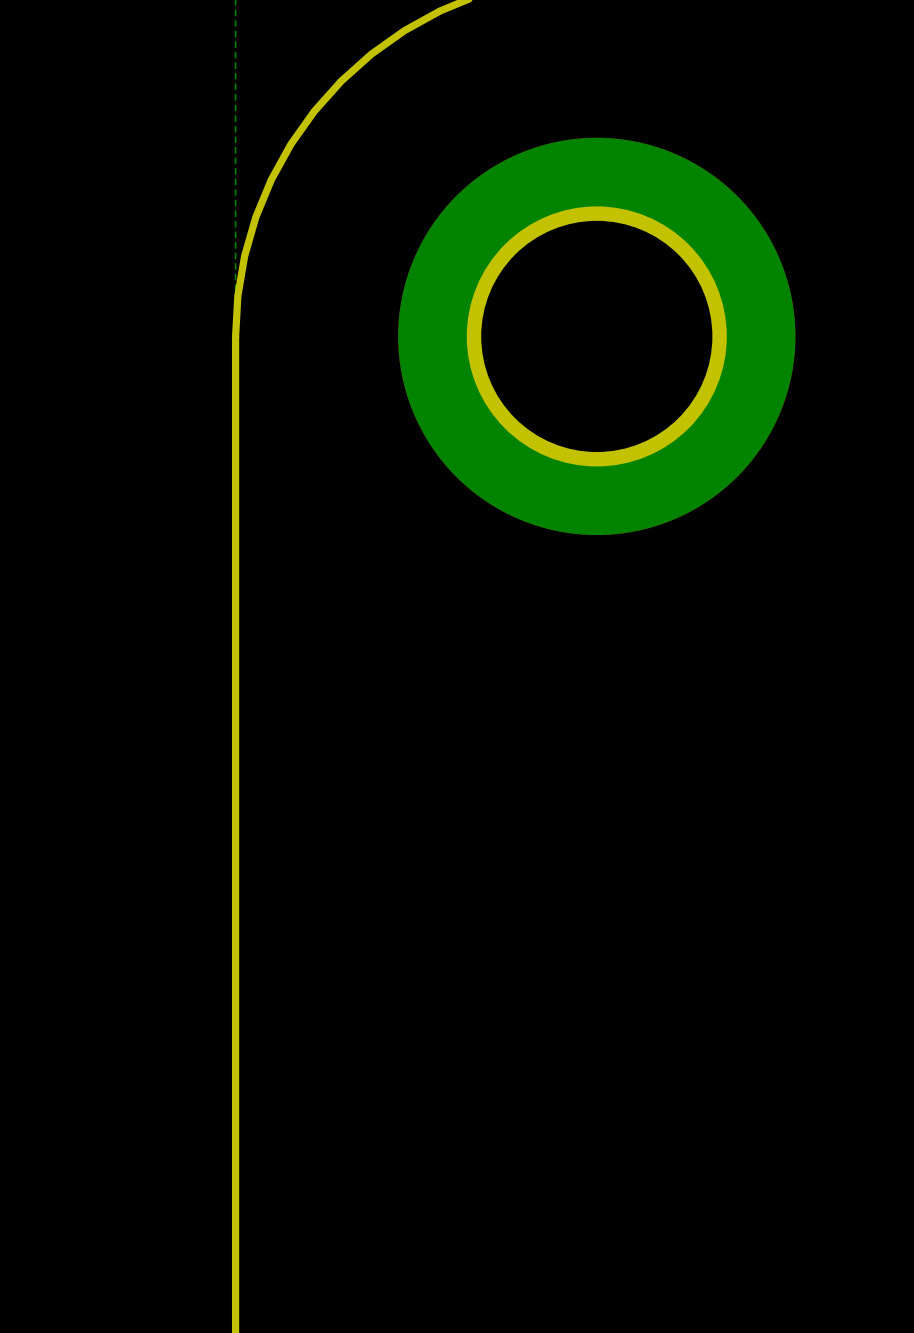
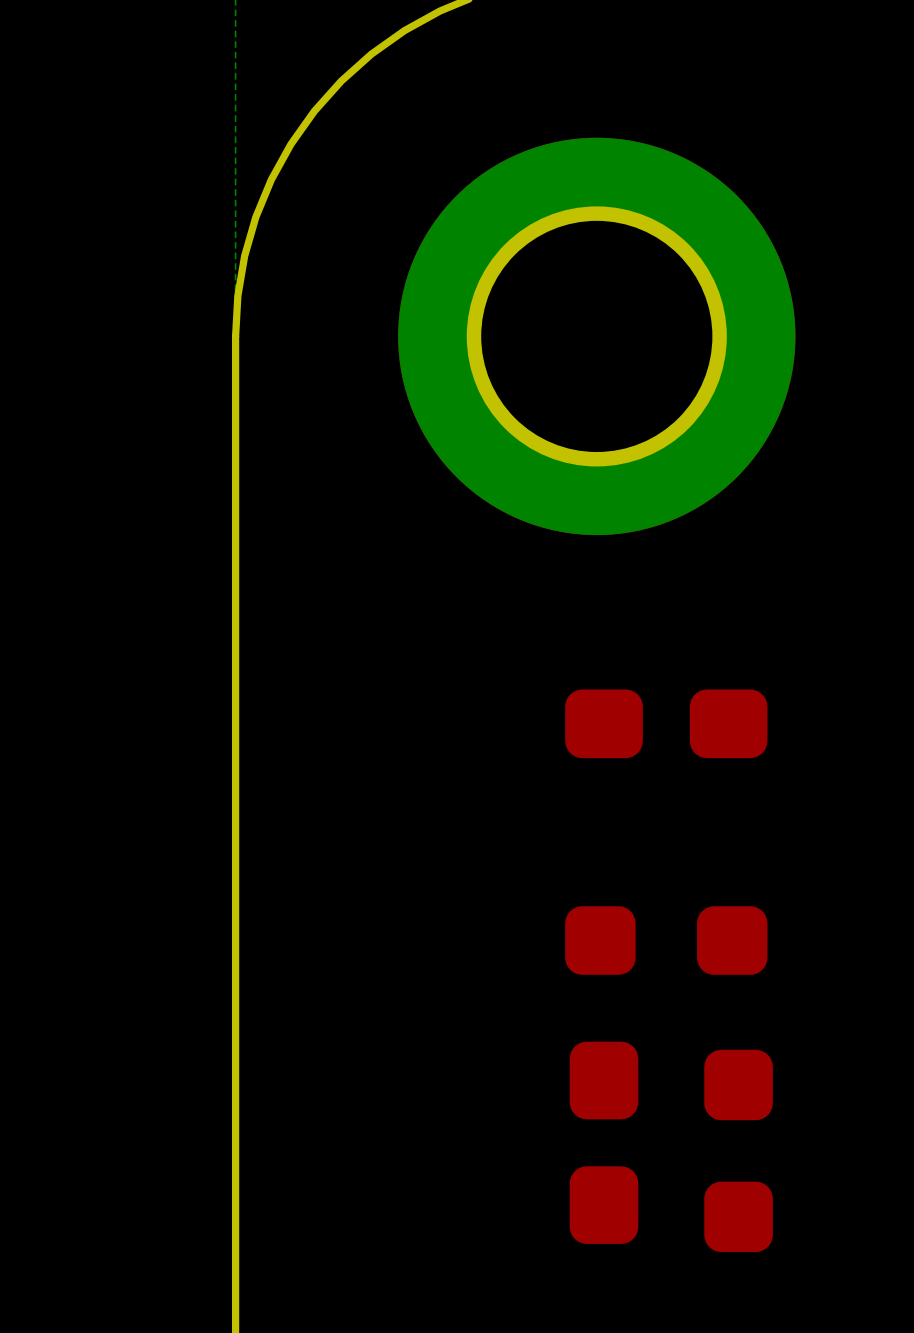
part: none -> (666, 723)
part: none -> (666, 940)
part: none -> (604, 1142)
part: none -> (738, 1150)

